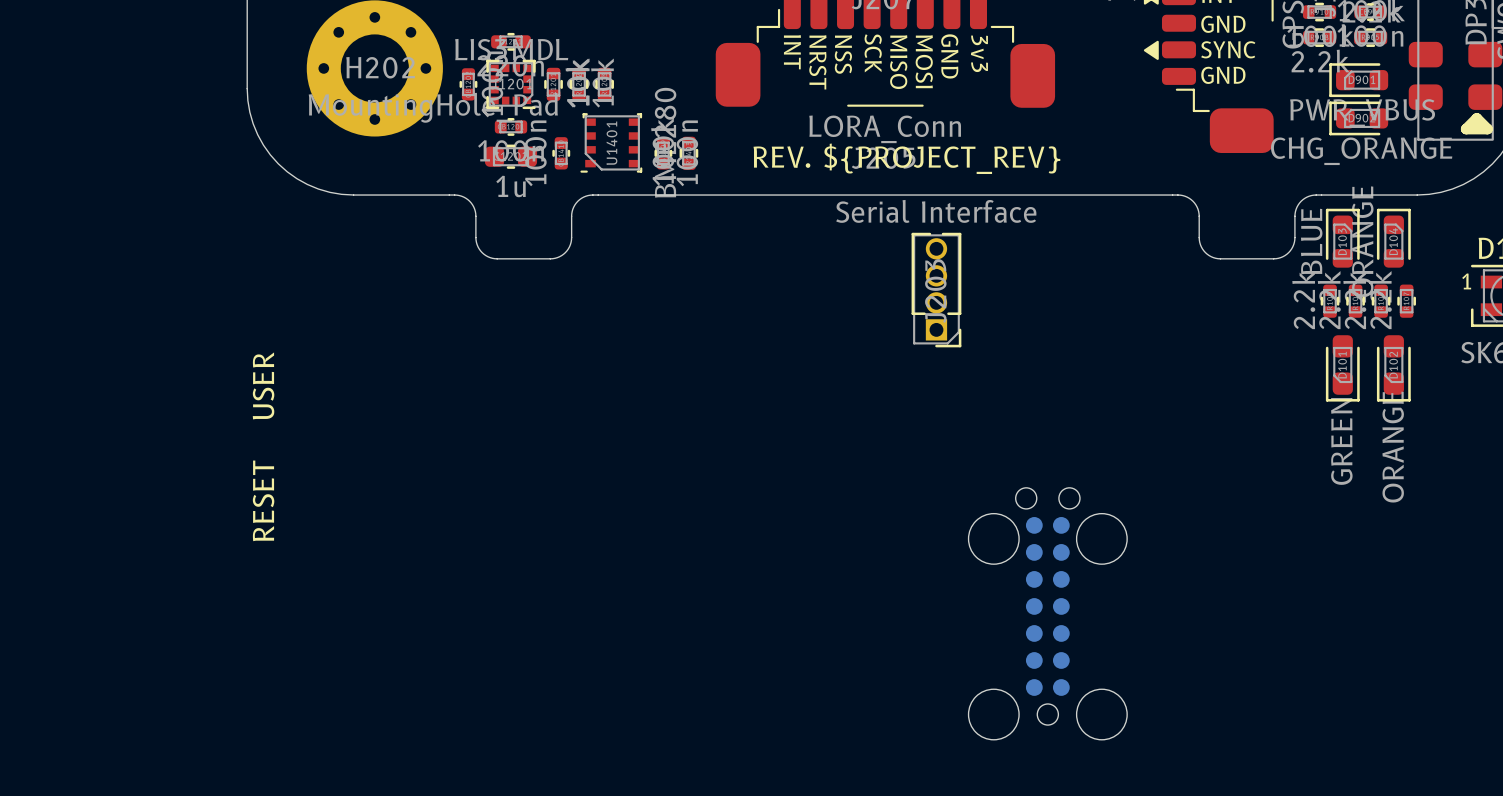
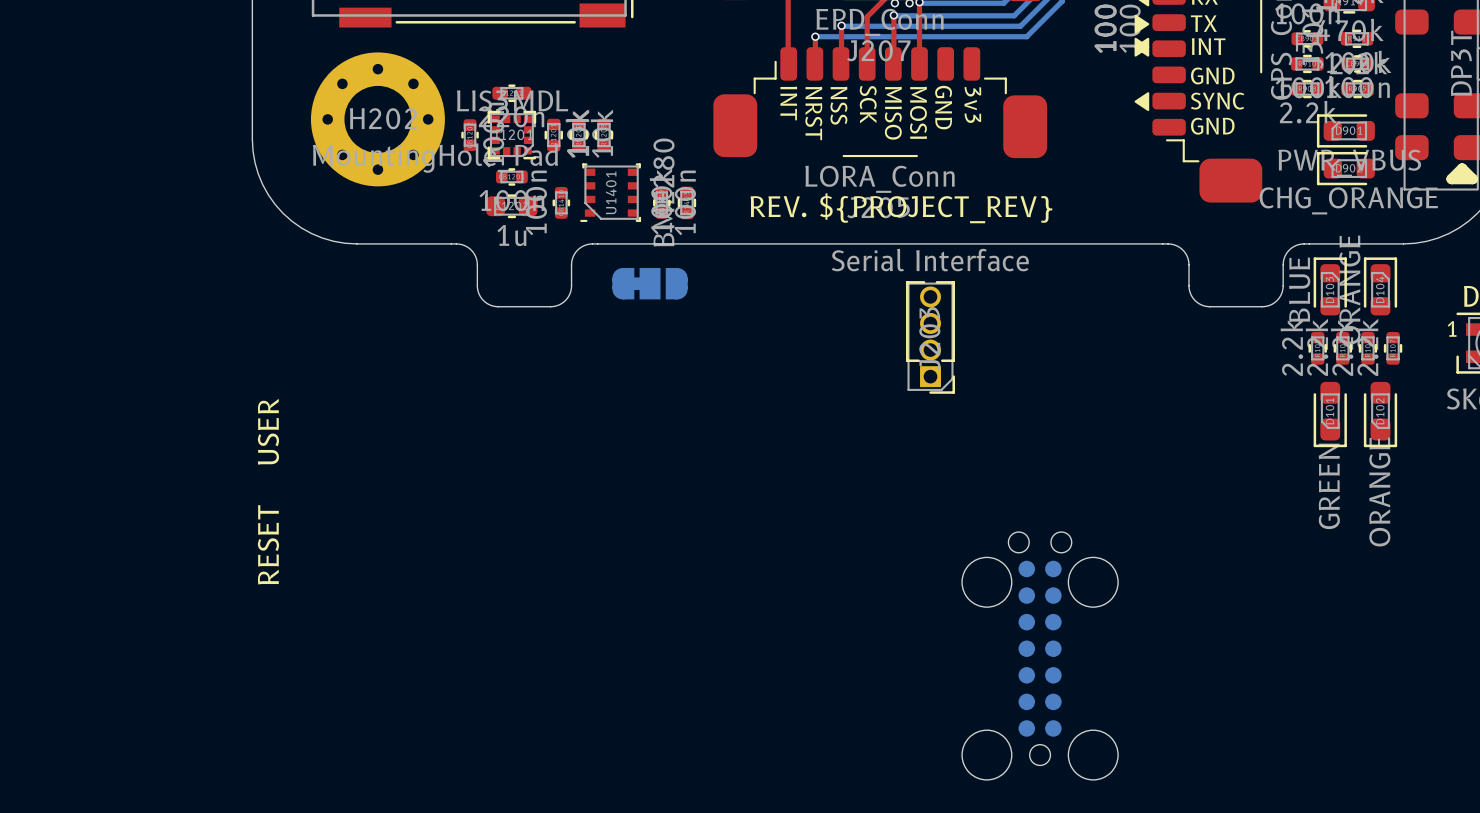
part: none -> (650, 283)

